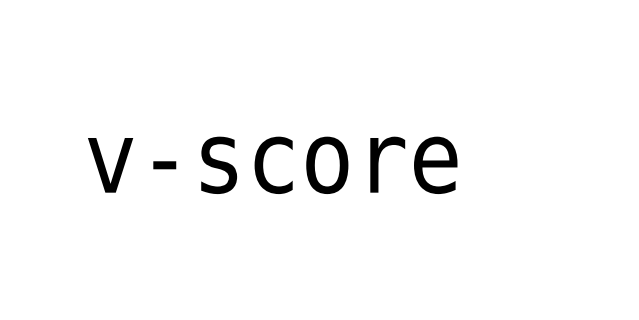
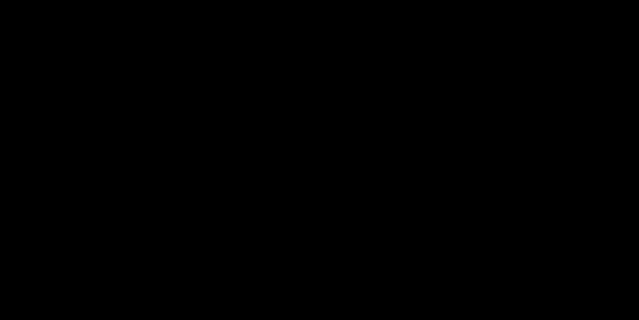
text: v-score (272, 165) -> none

